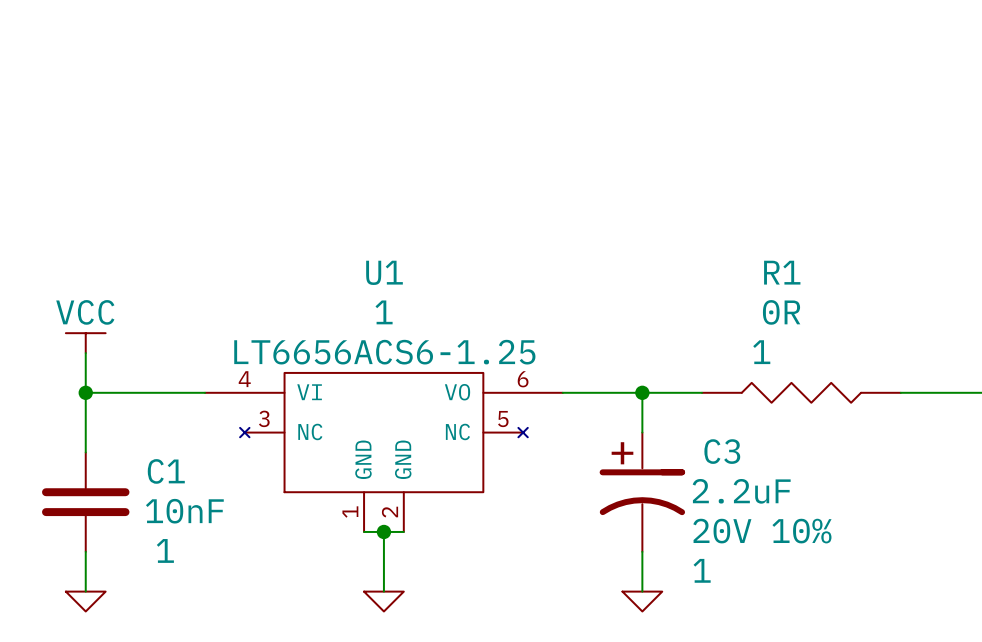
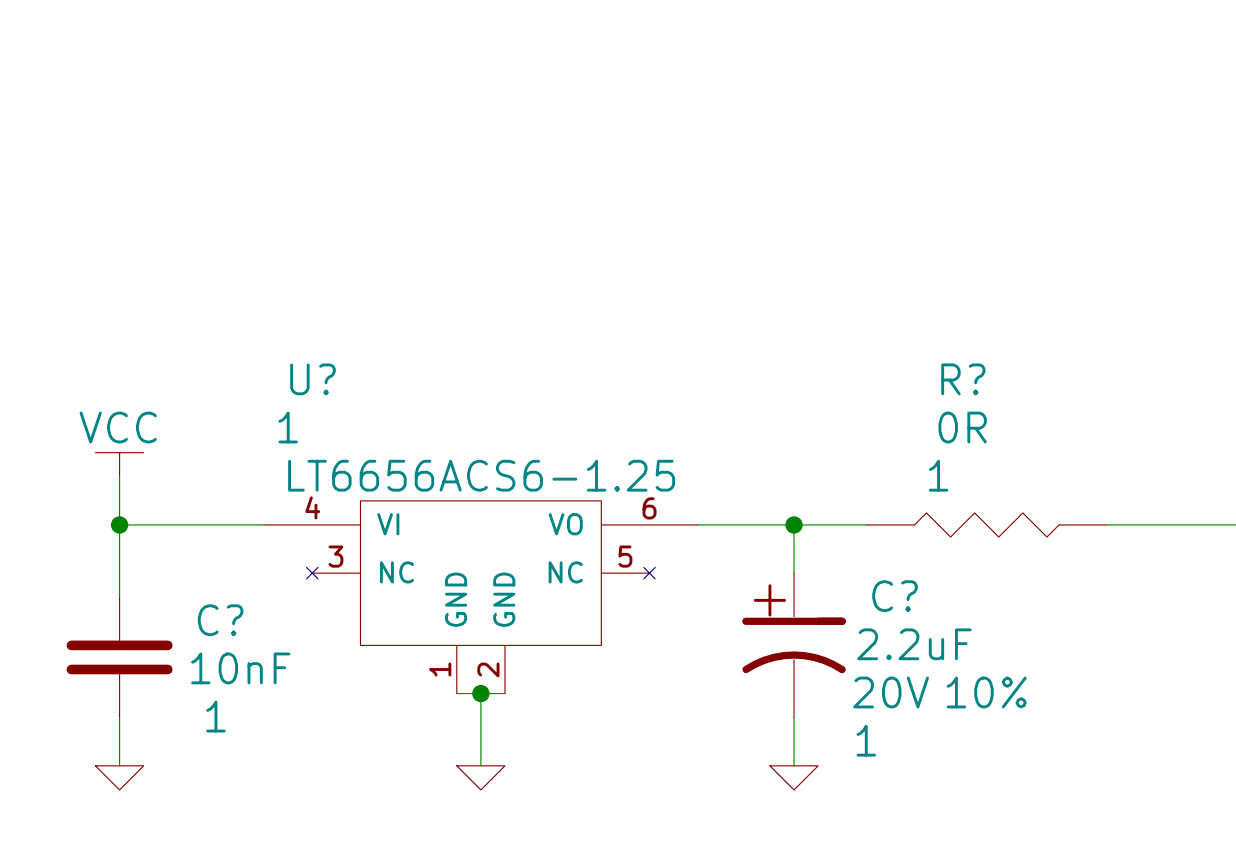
U1 name: U1 (384, 272) -> U? (312, 379)
R1 name: R1 (782, 272) -> R? (963, 379)
U1 text position: 1 (384, 312) -> 1 (288, 427)
C3 name: C3 (722, 451) -> C? (895, 596)
C1 name: C1 (166, 471) -> C? (220, 620)

